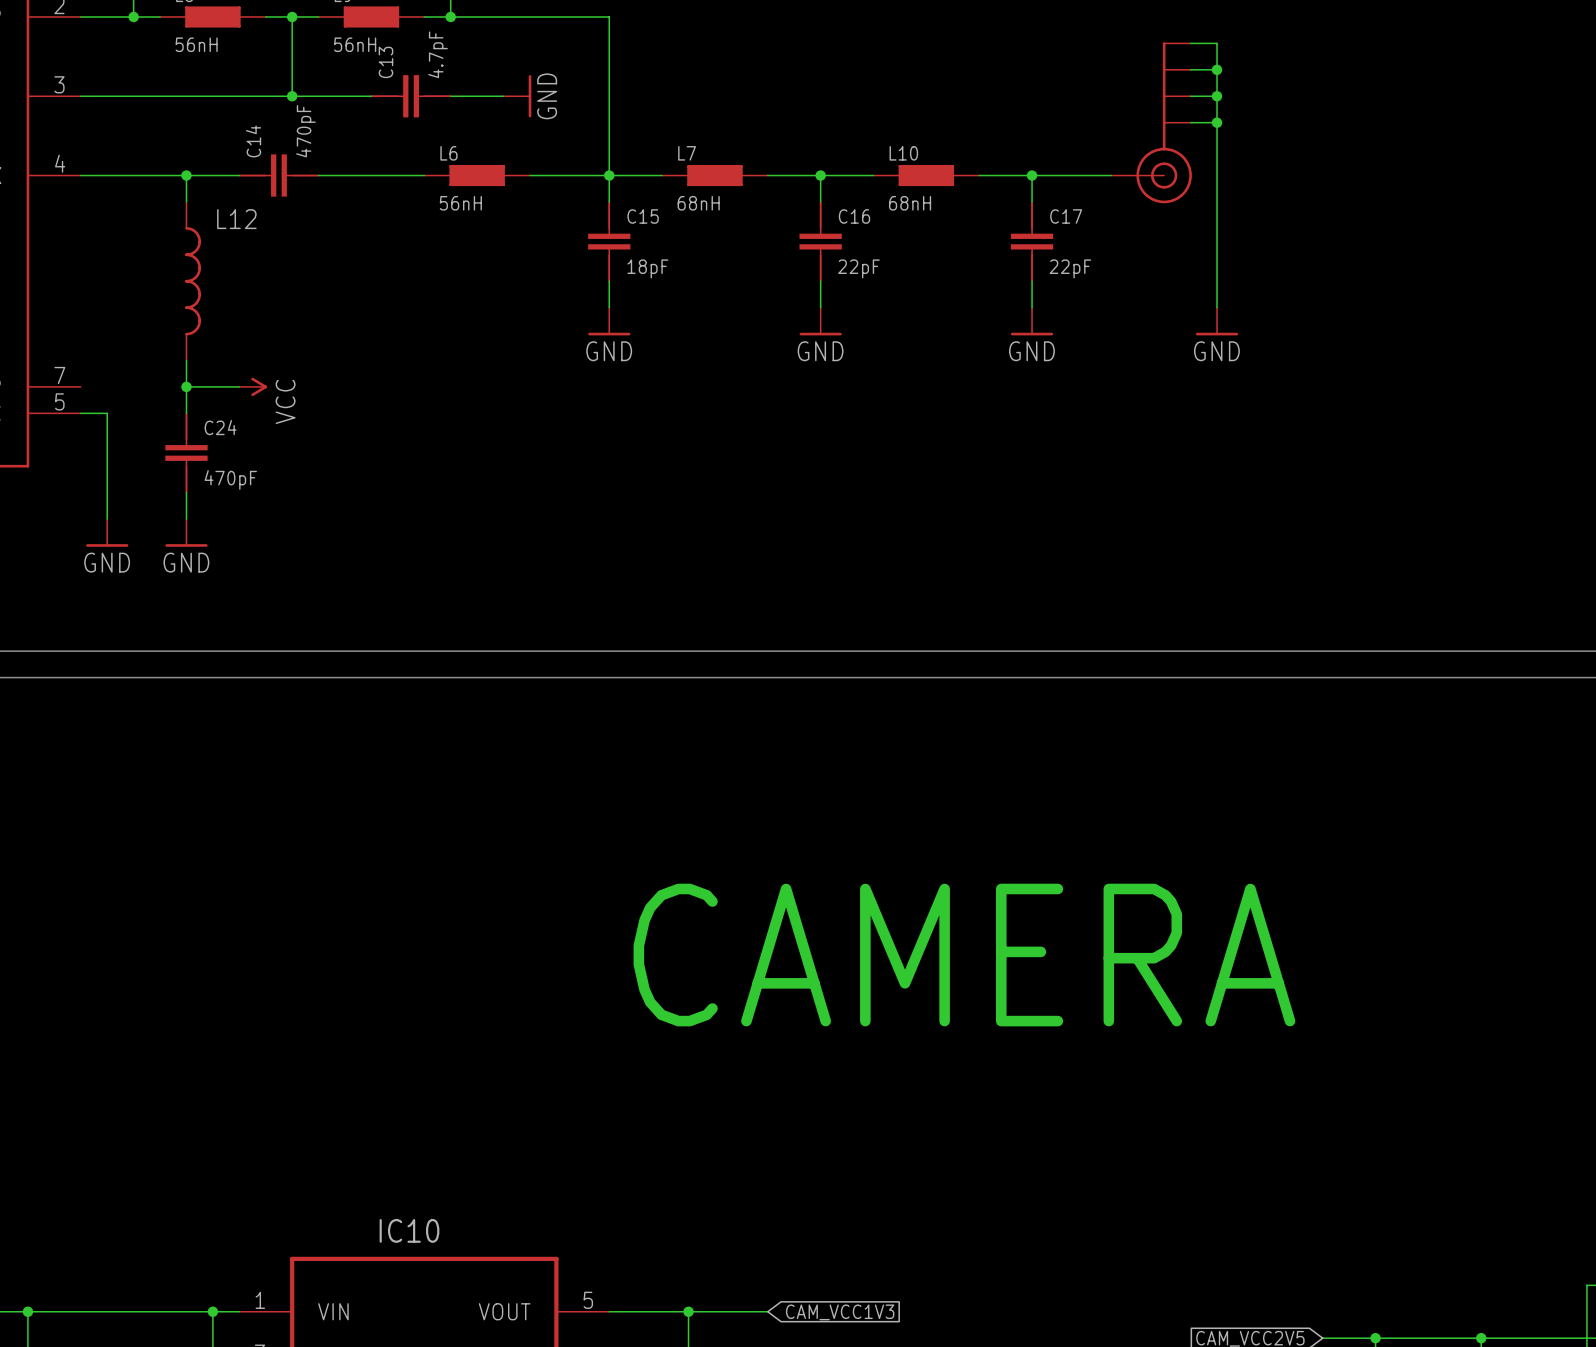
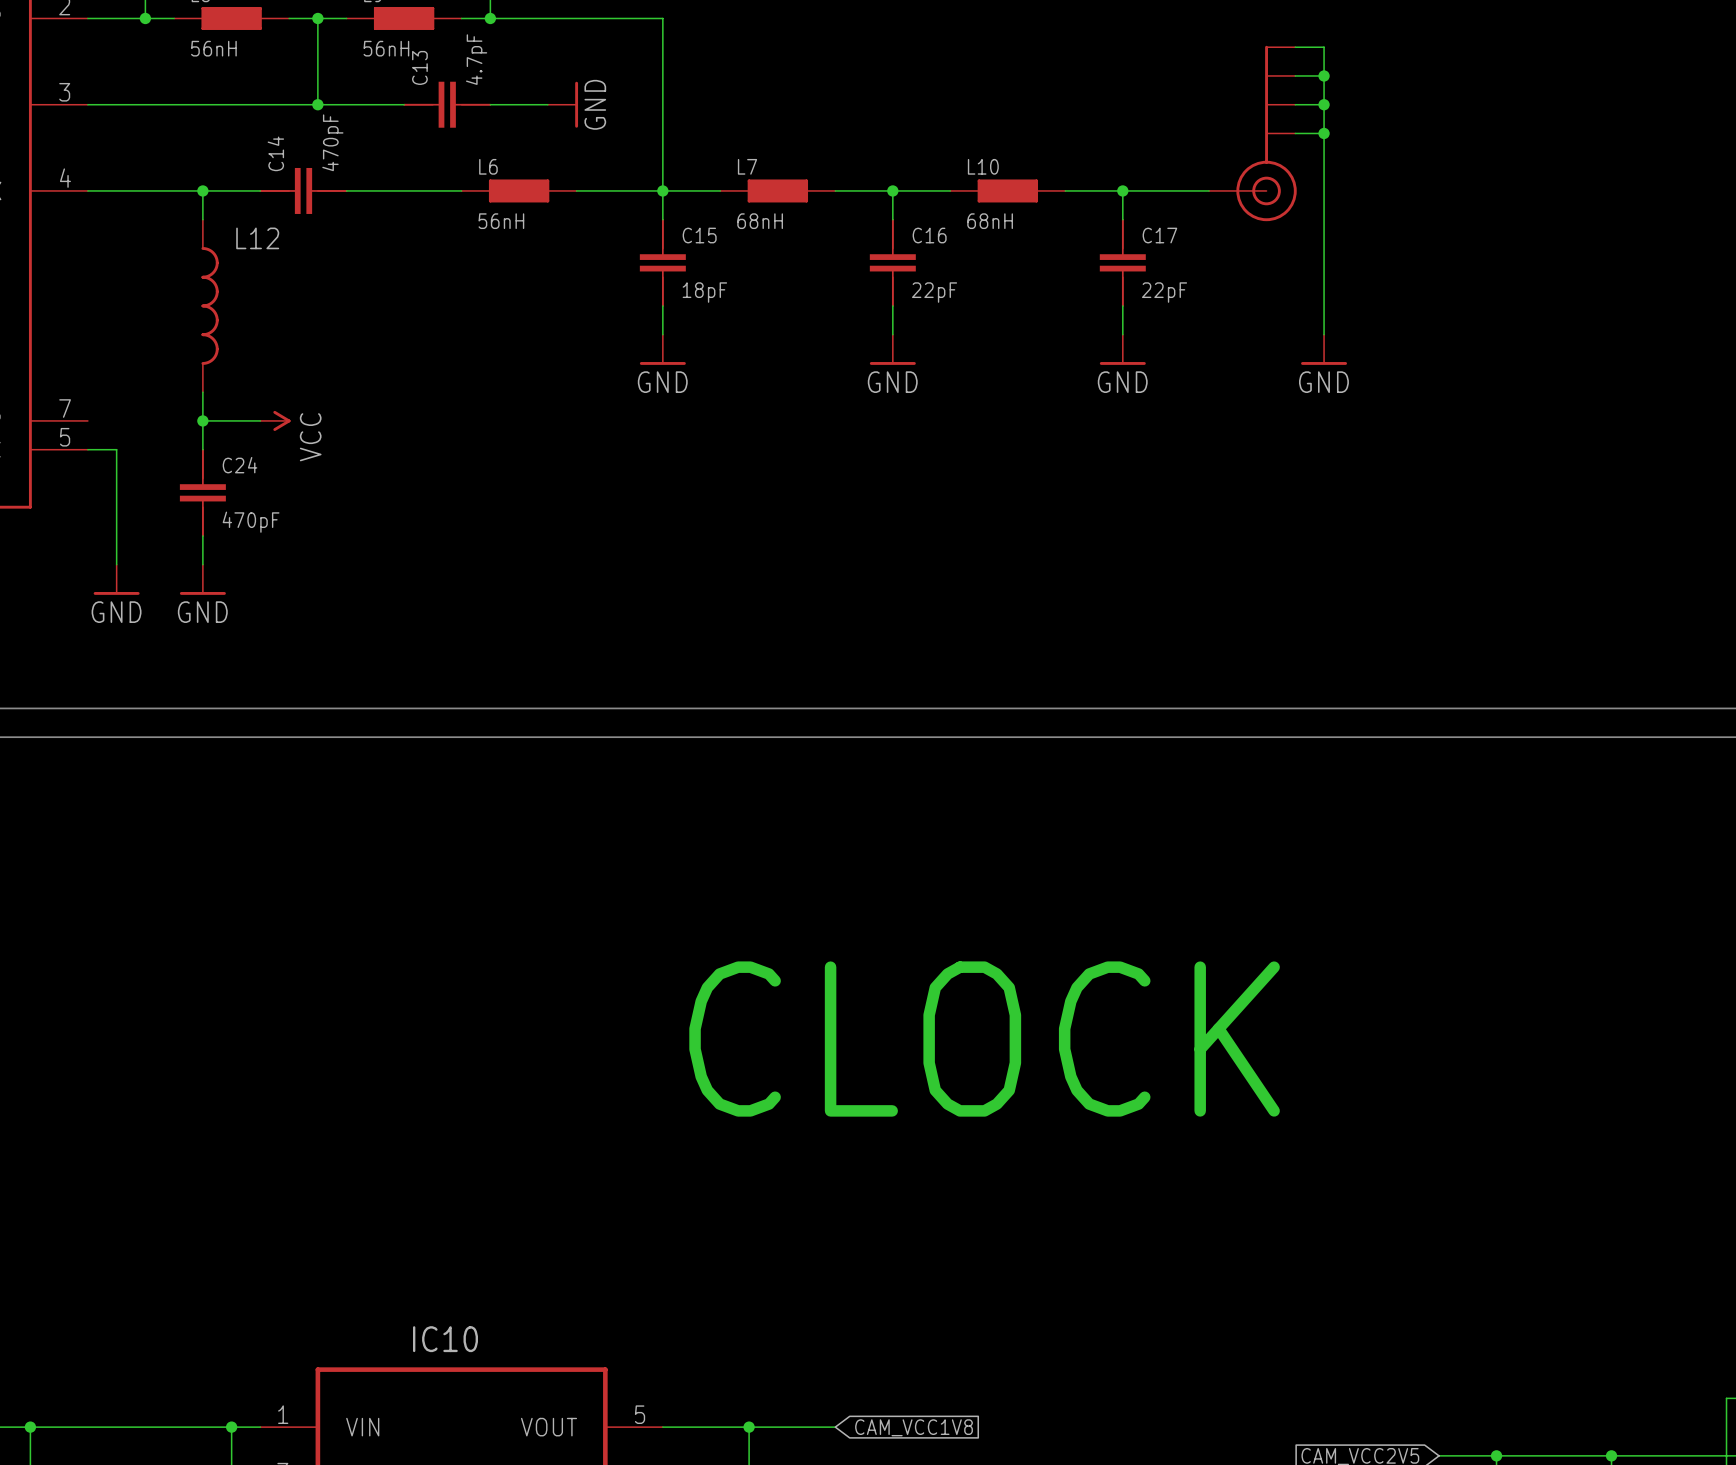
text: CAMERA (964, 955) -> CLOCK (984, 1039)
global label: CAM_VCC1V3 (840, 1312) -> CAM_VCC1V8 (914, 1427)

